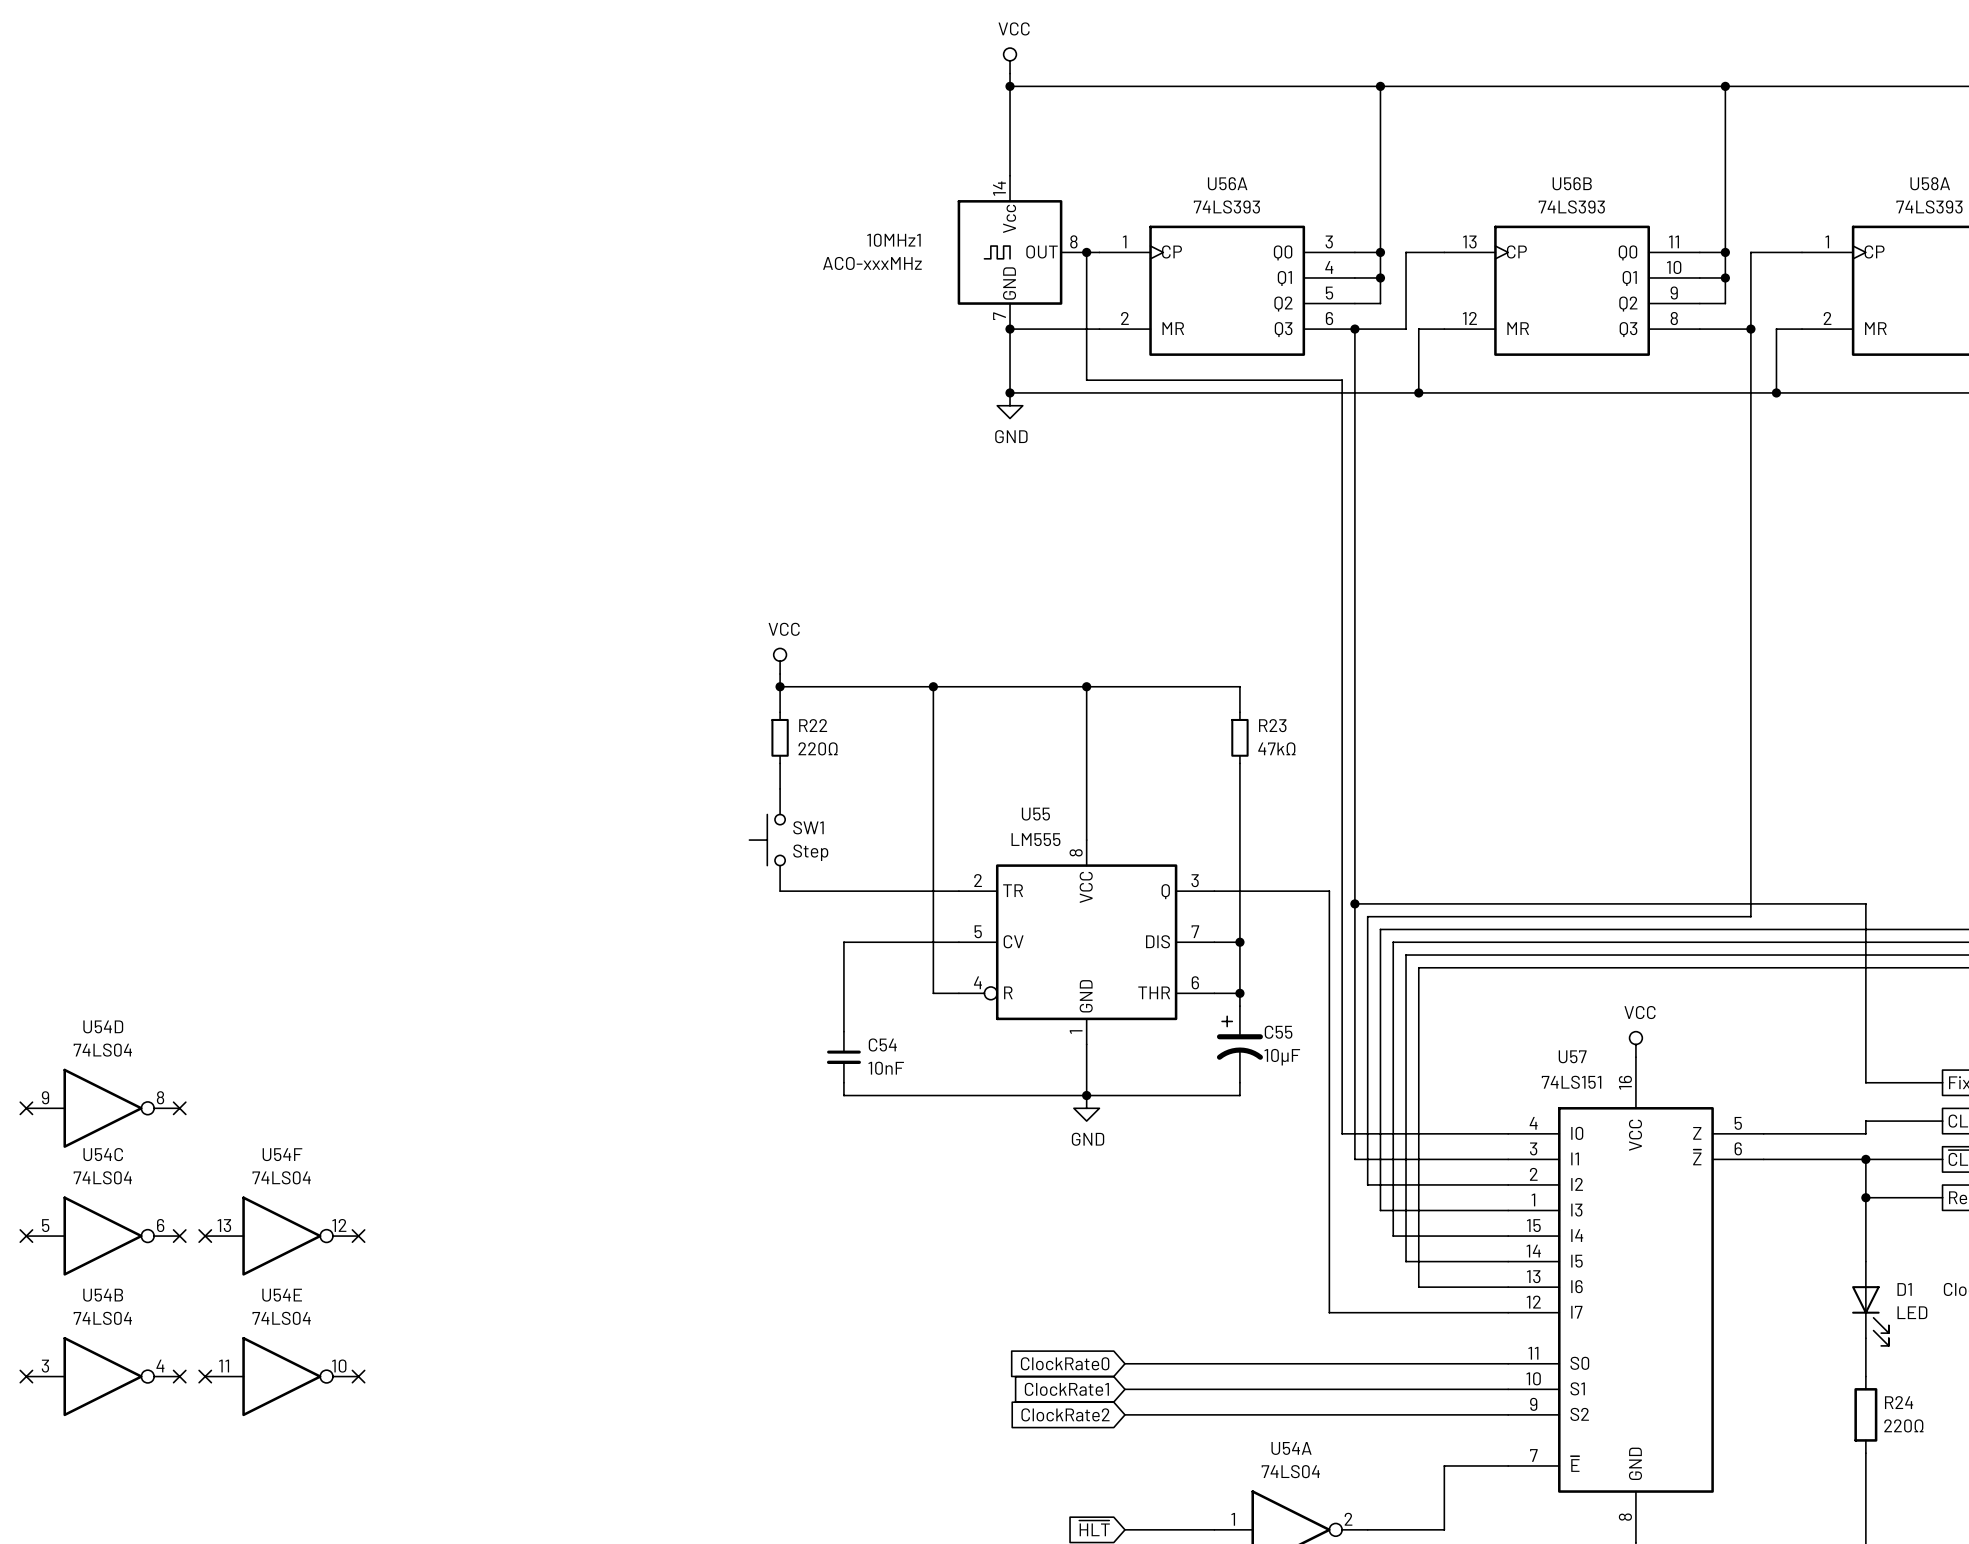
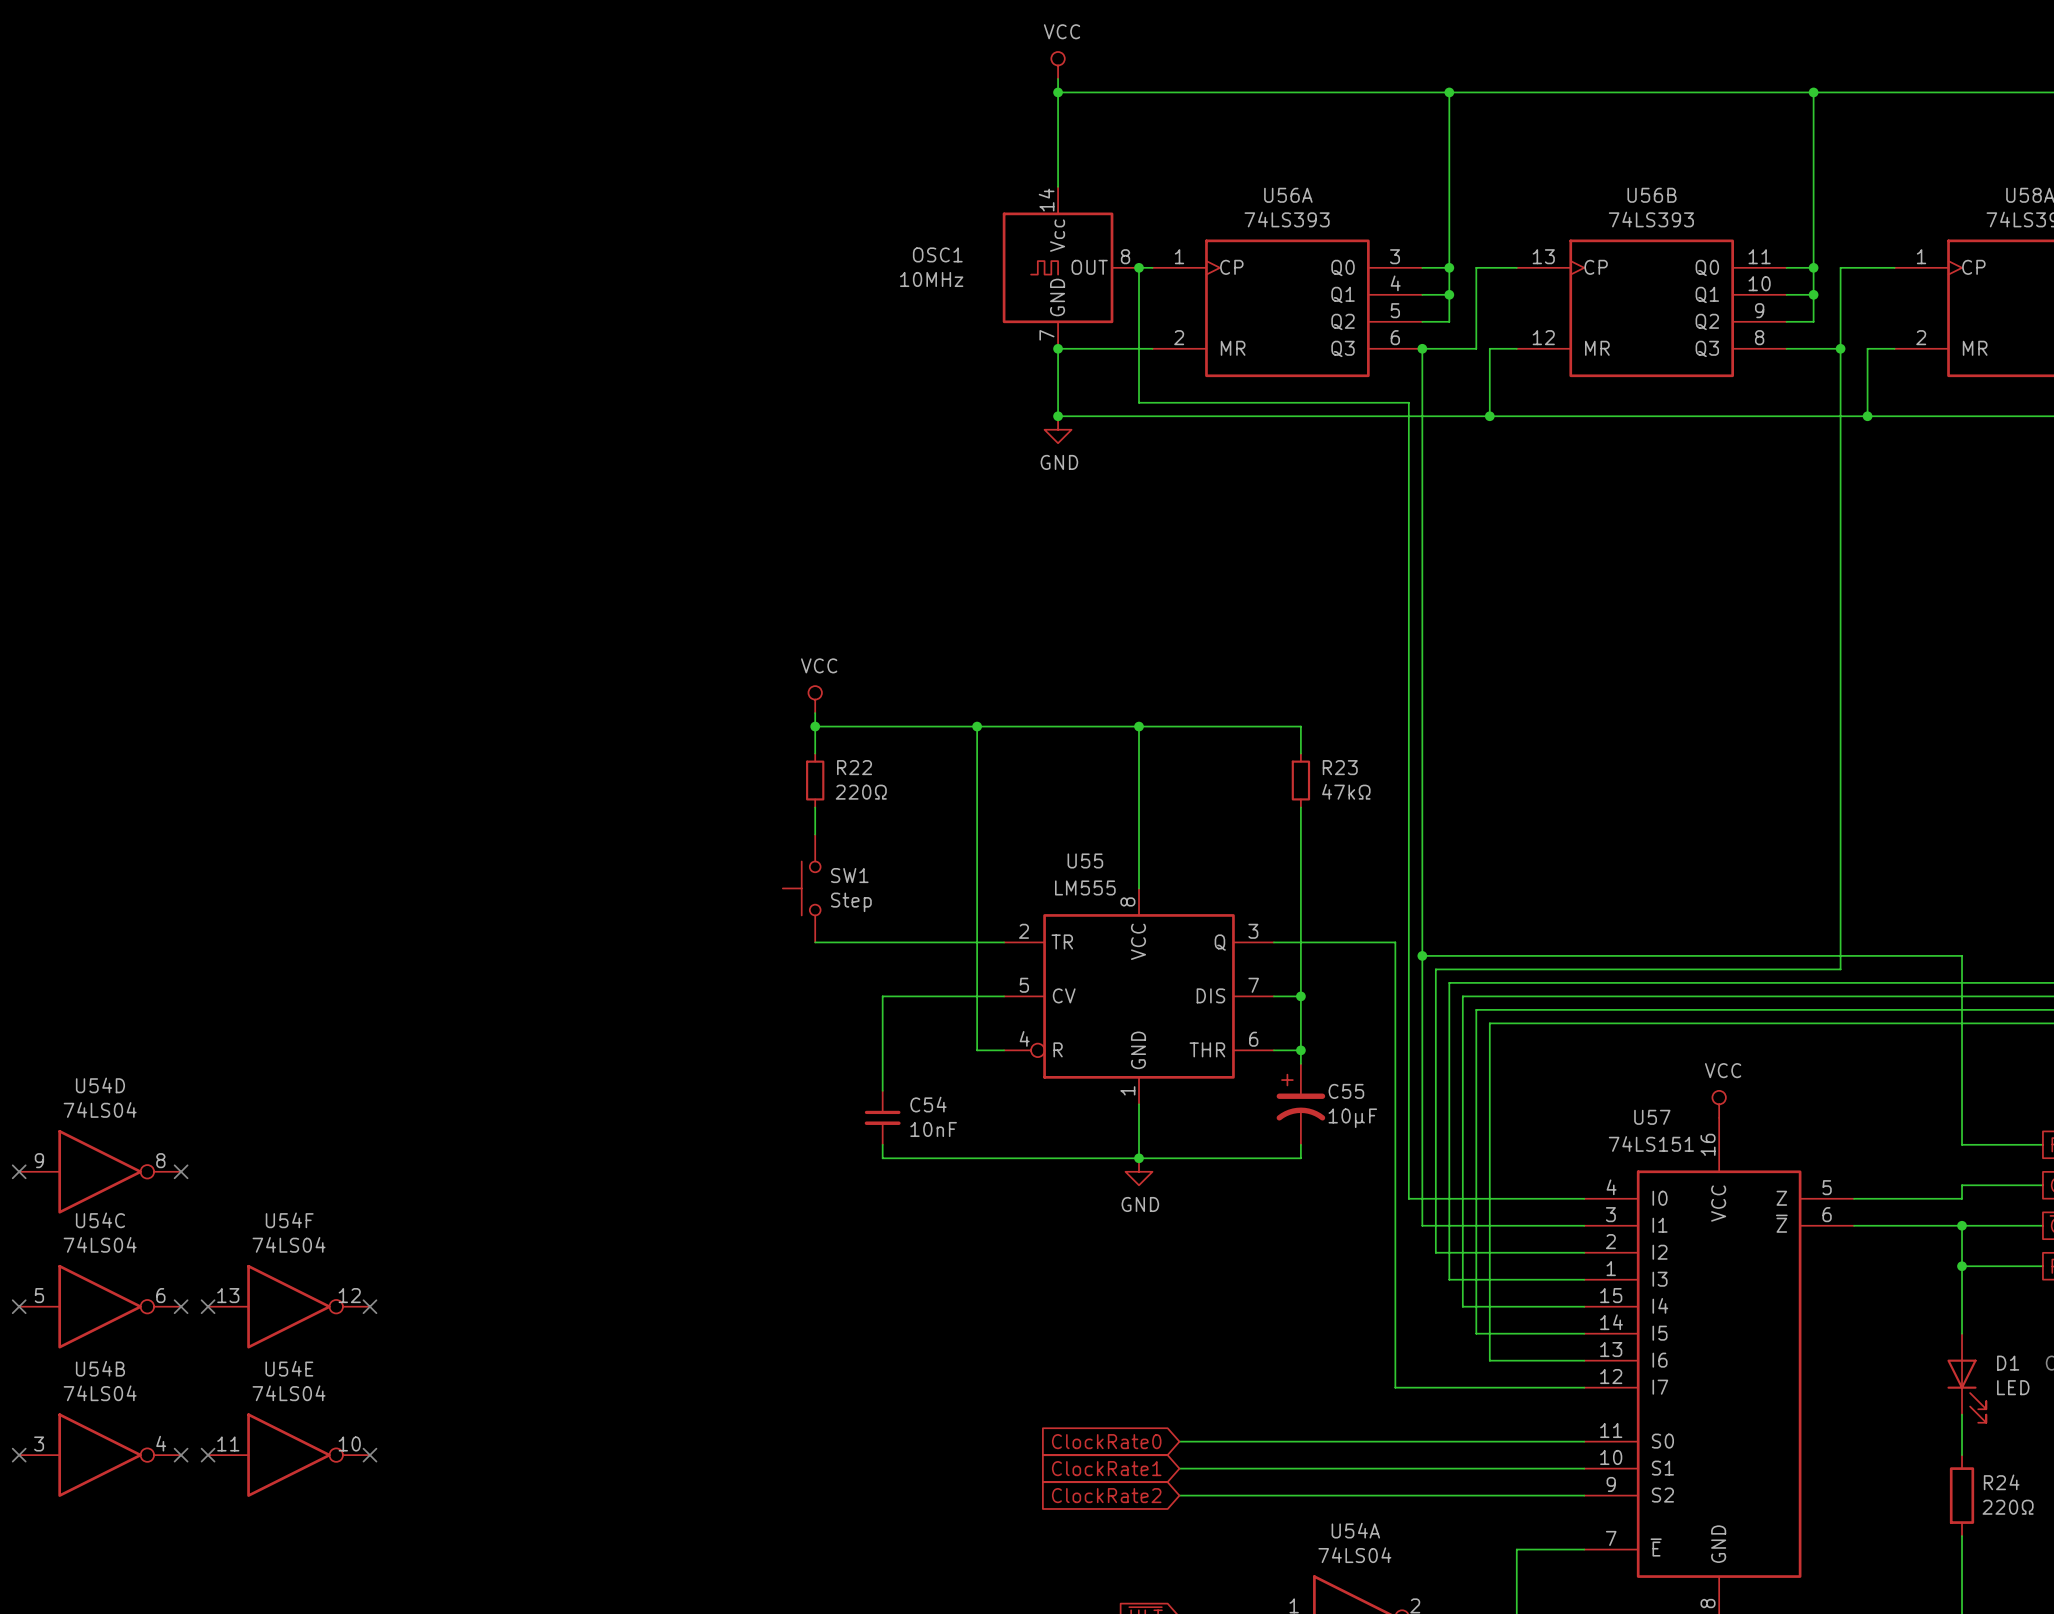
10MHz1 name: 10MHz1 (893, 240) -> OSC1 (937, 254)
10MHz1 value: ACO-xxxMHz (872, 263) -> 10MHz (931, 279)

